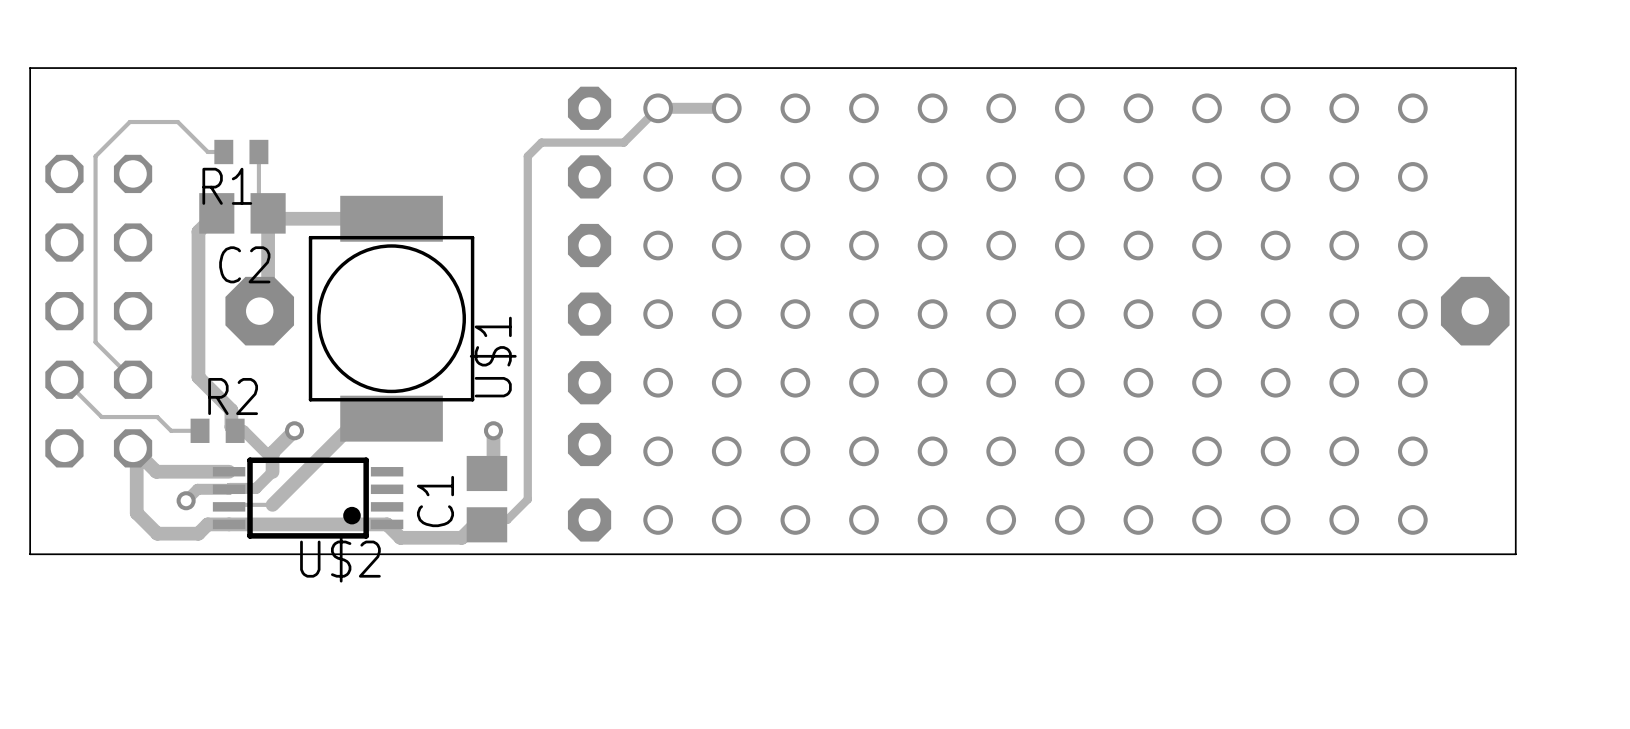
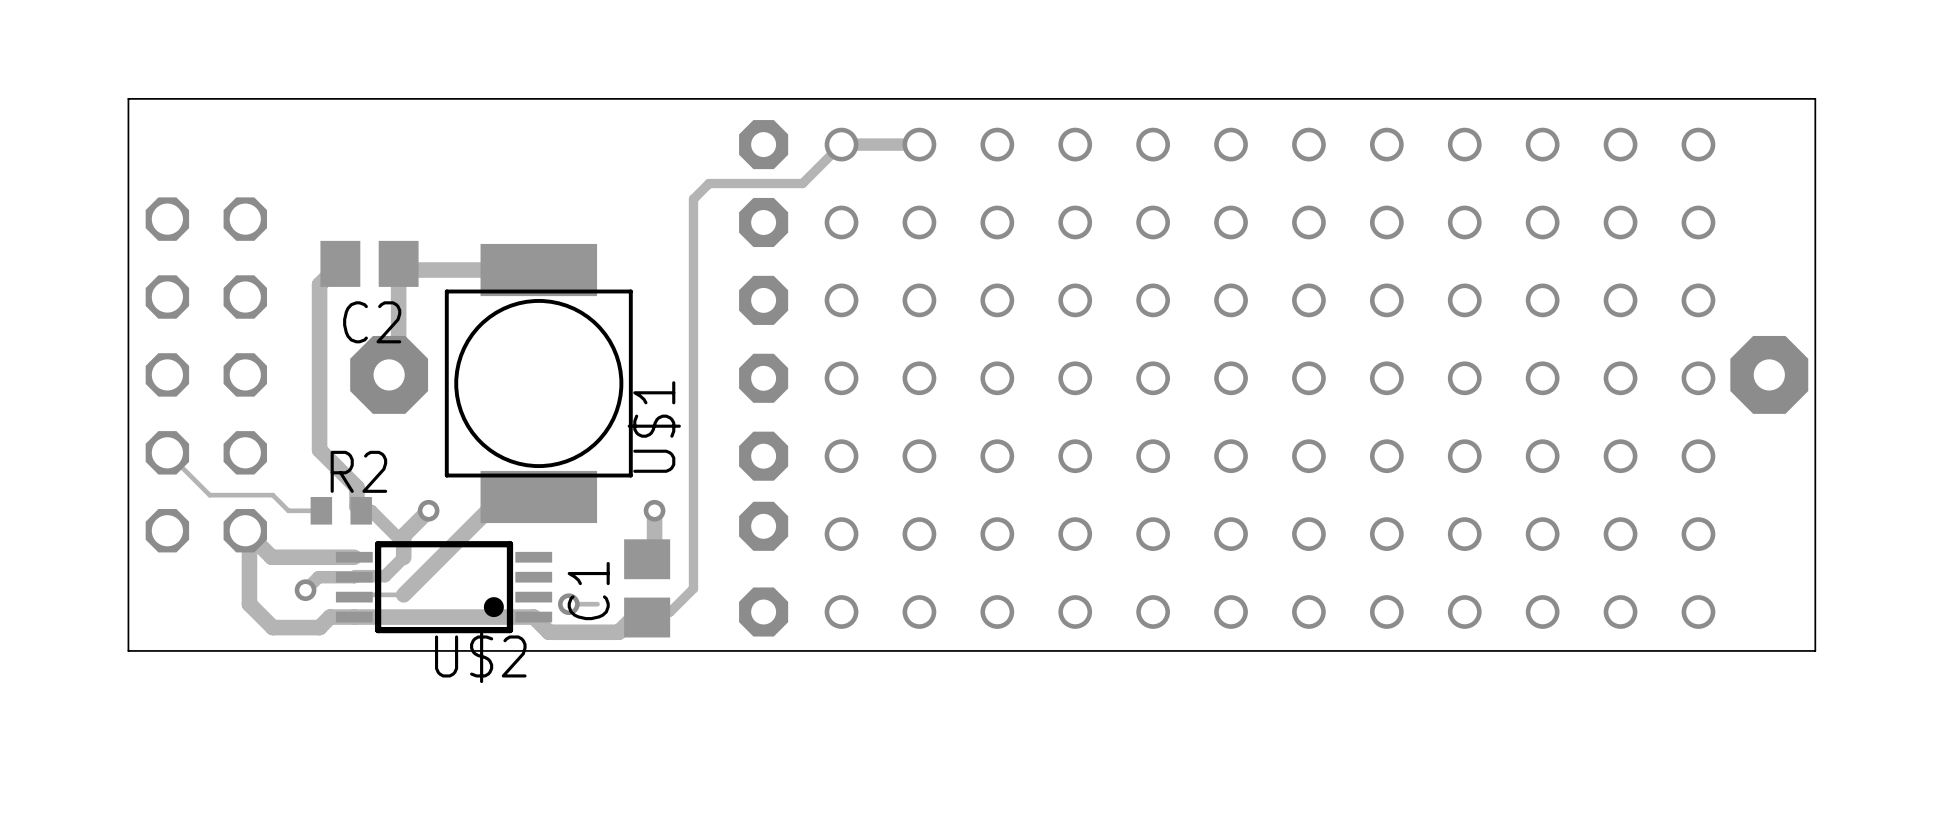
track: (223, 152) (207, 152) (177, 122) (129, 122) (95, 156) (95, 342) (133, 379) -> none
R1: (241, 152) -> none
track: (258, 152) (258, 204) (268, 213) -> none
via: none -> (568, 604)
track: none -> (597, 604) (568, 604)

